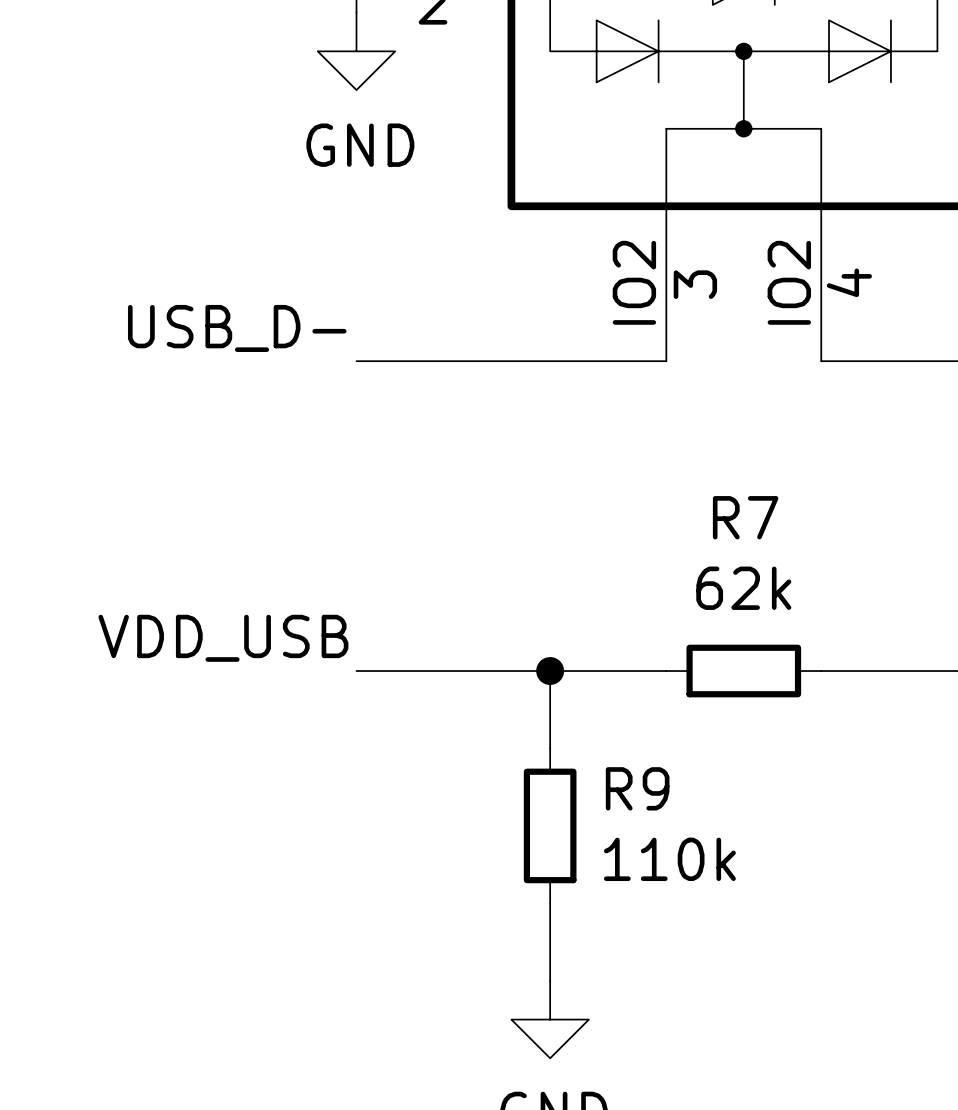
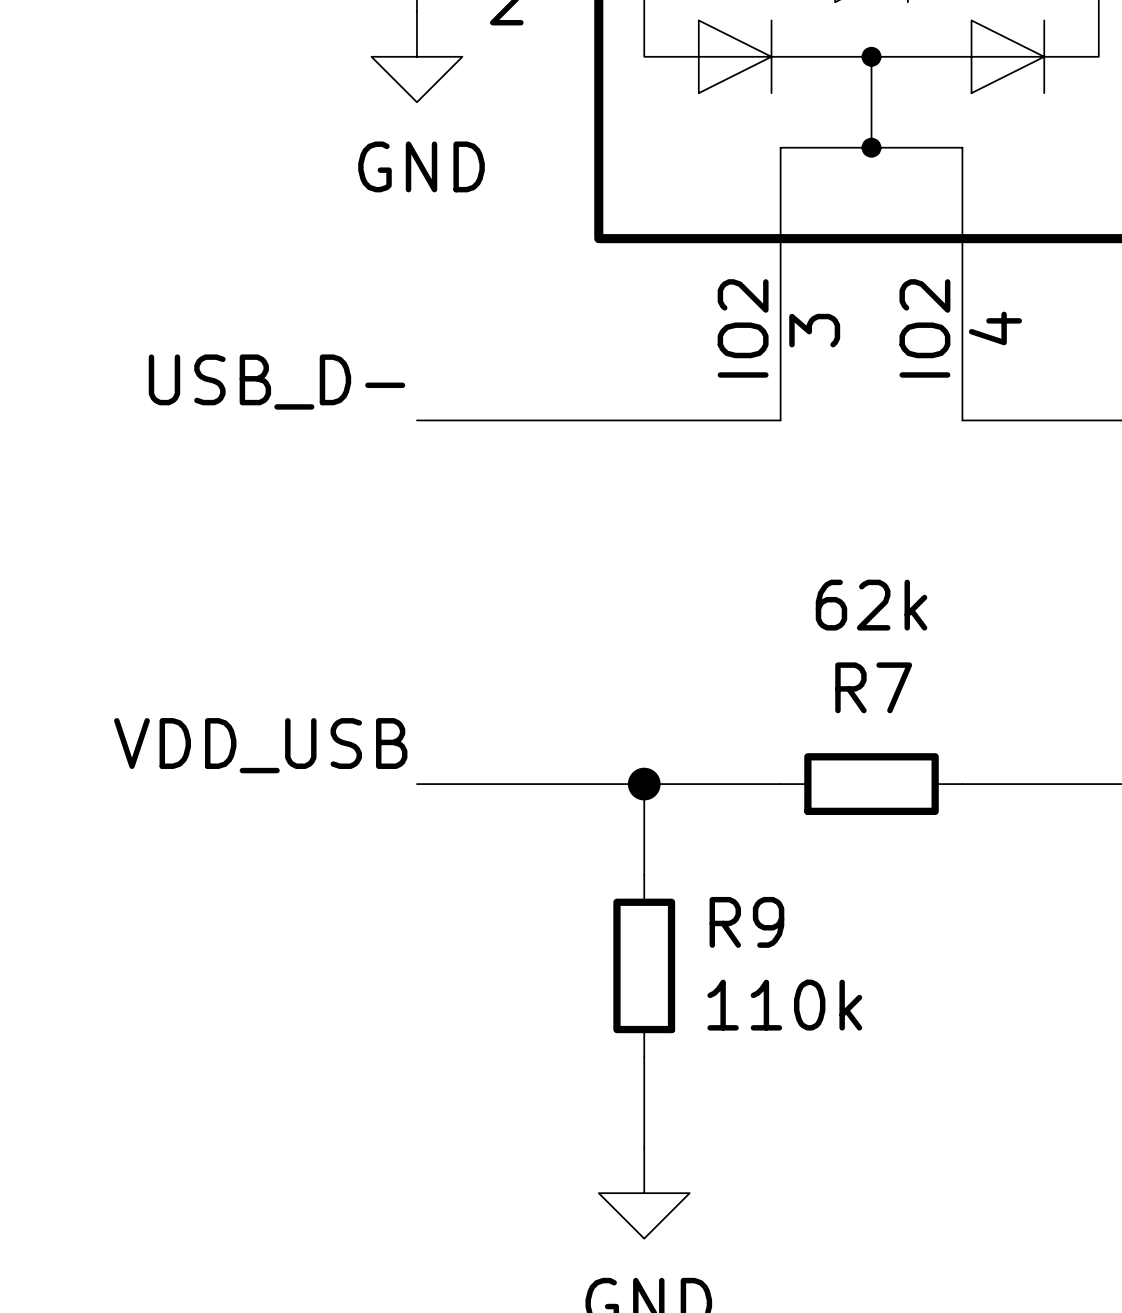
R7 name position: R7 (745, 517) -> R7 (873, 687)
R7 value position: 62k (743, 588) -> 62k (871, 605)

